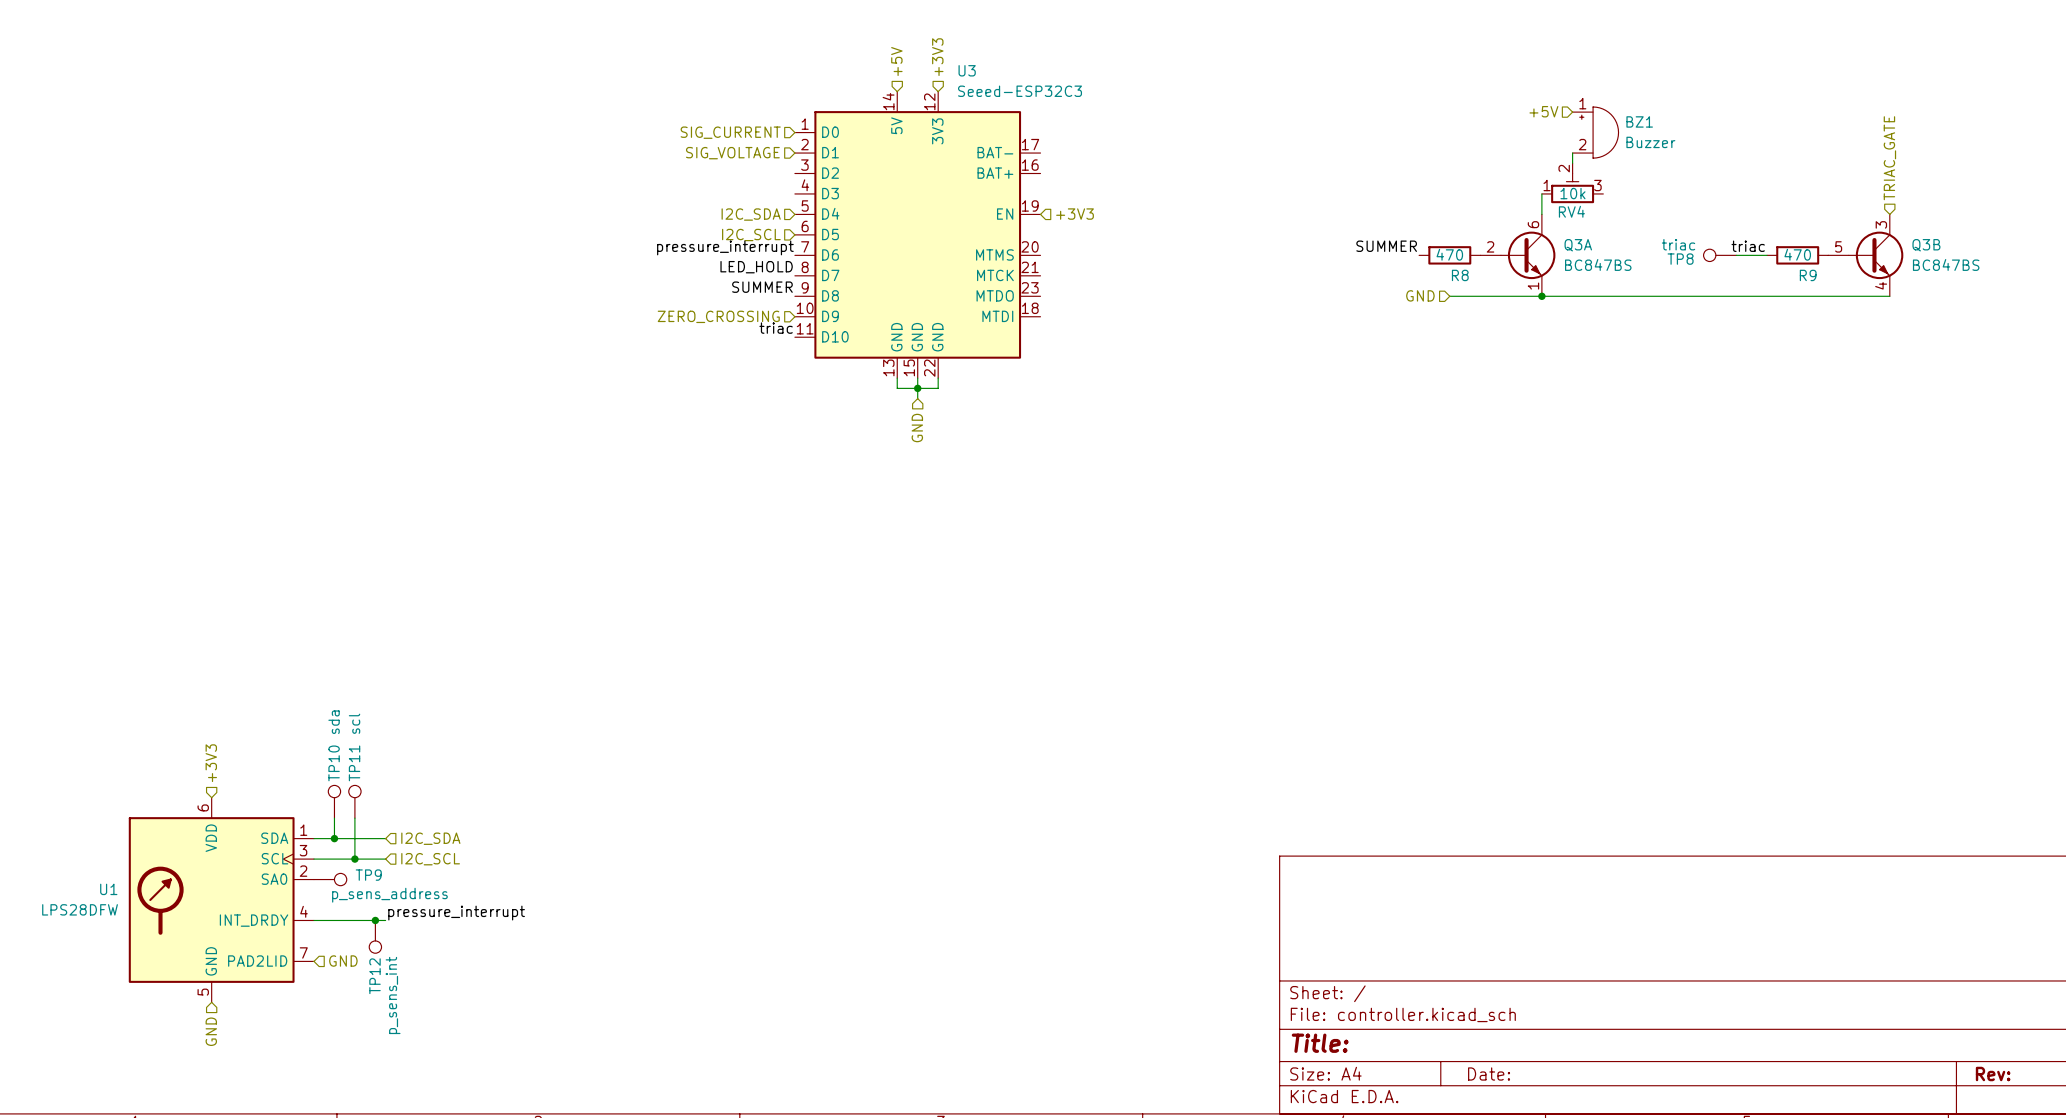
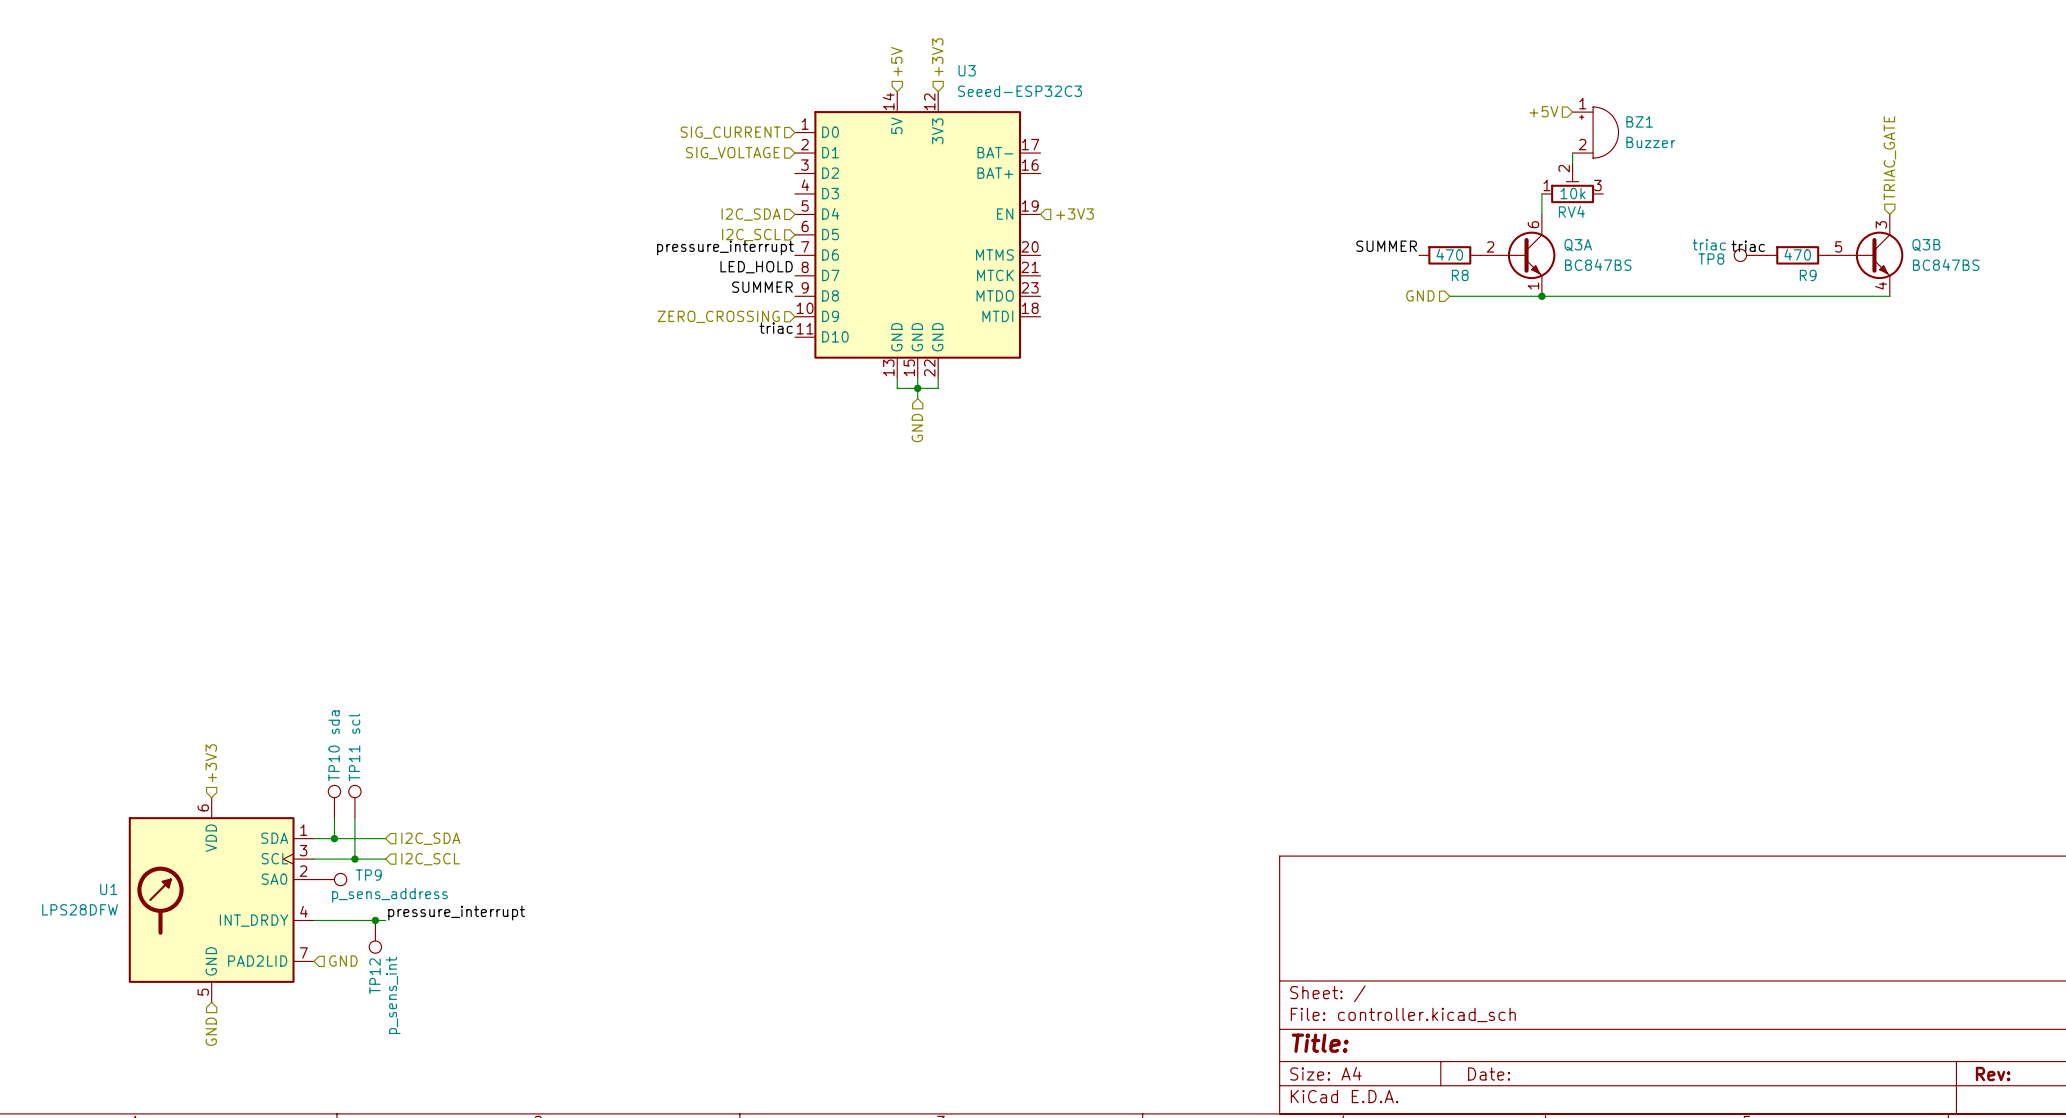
TP8 position: (1719, 255) -> (1750, 255)

